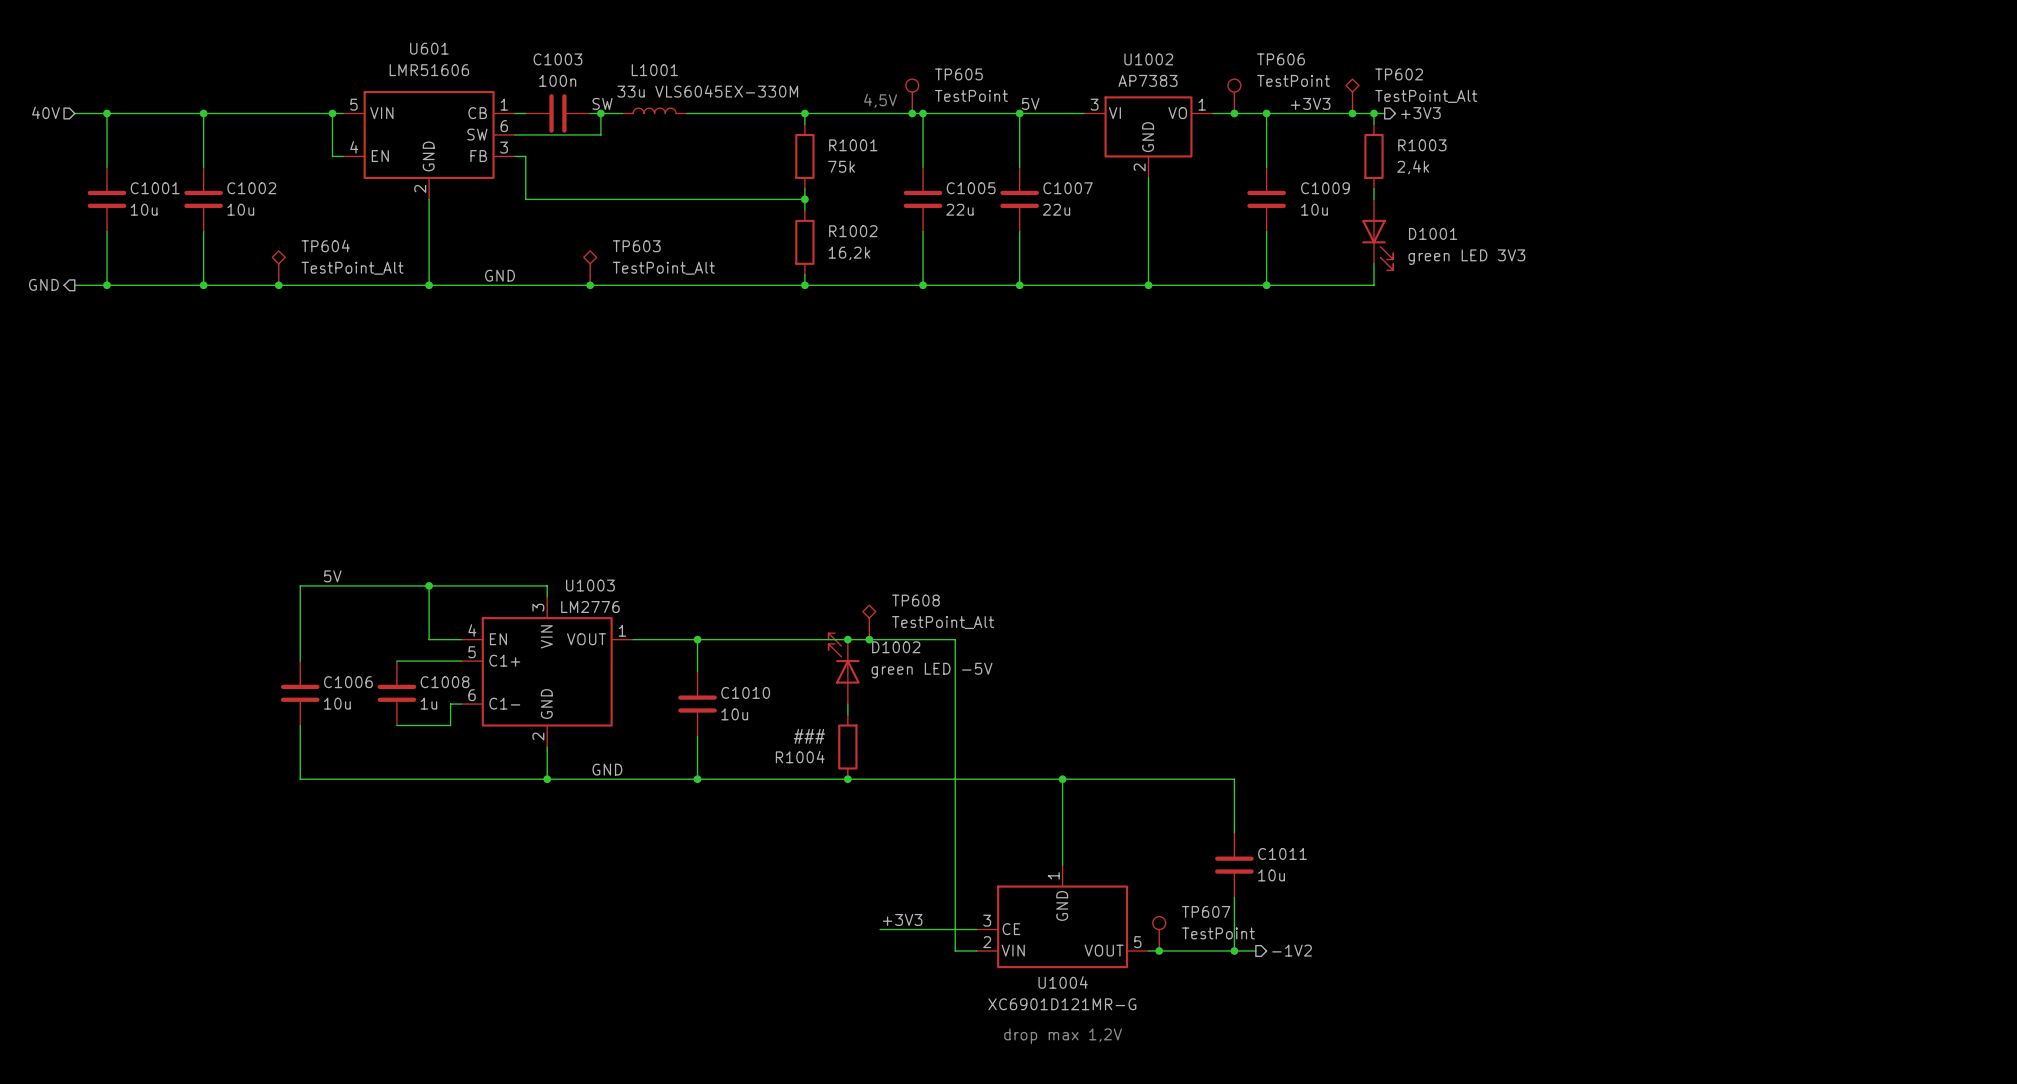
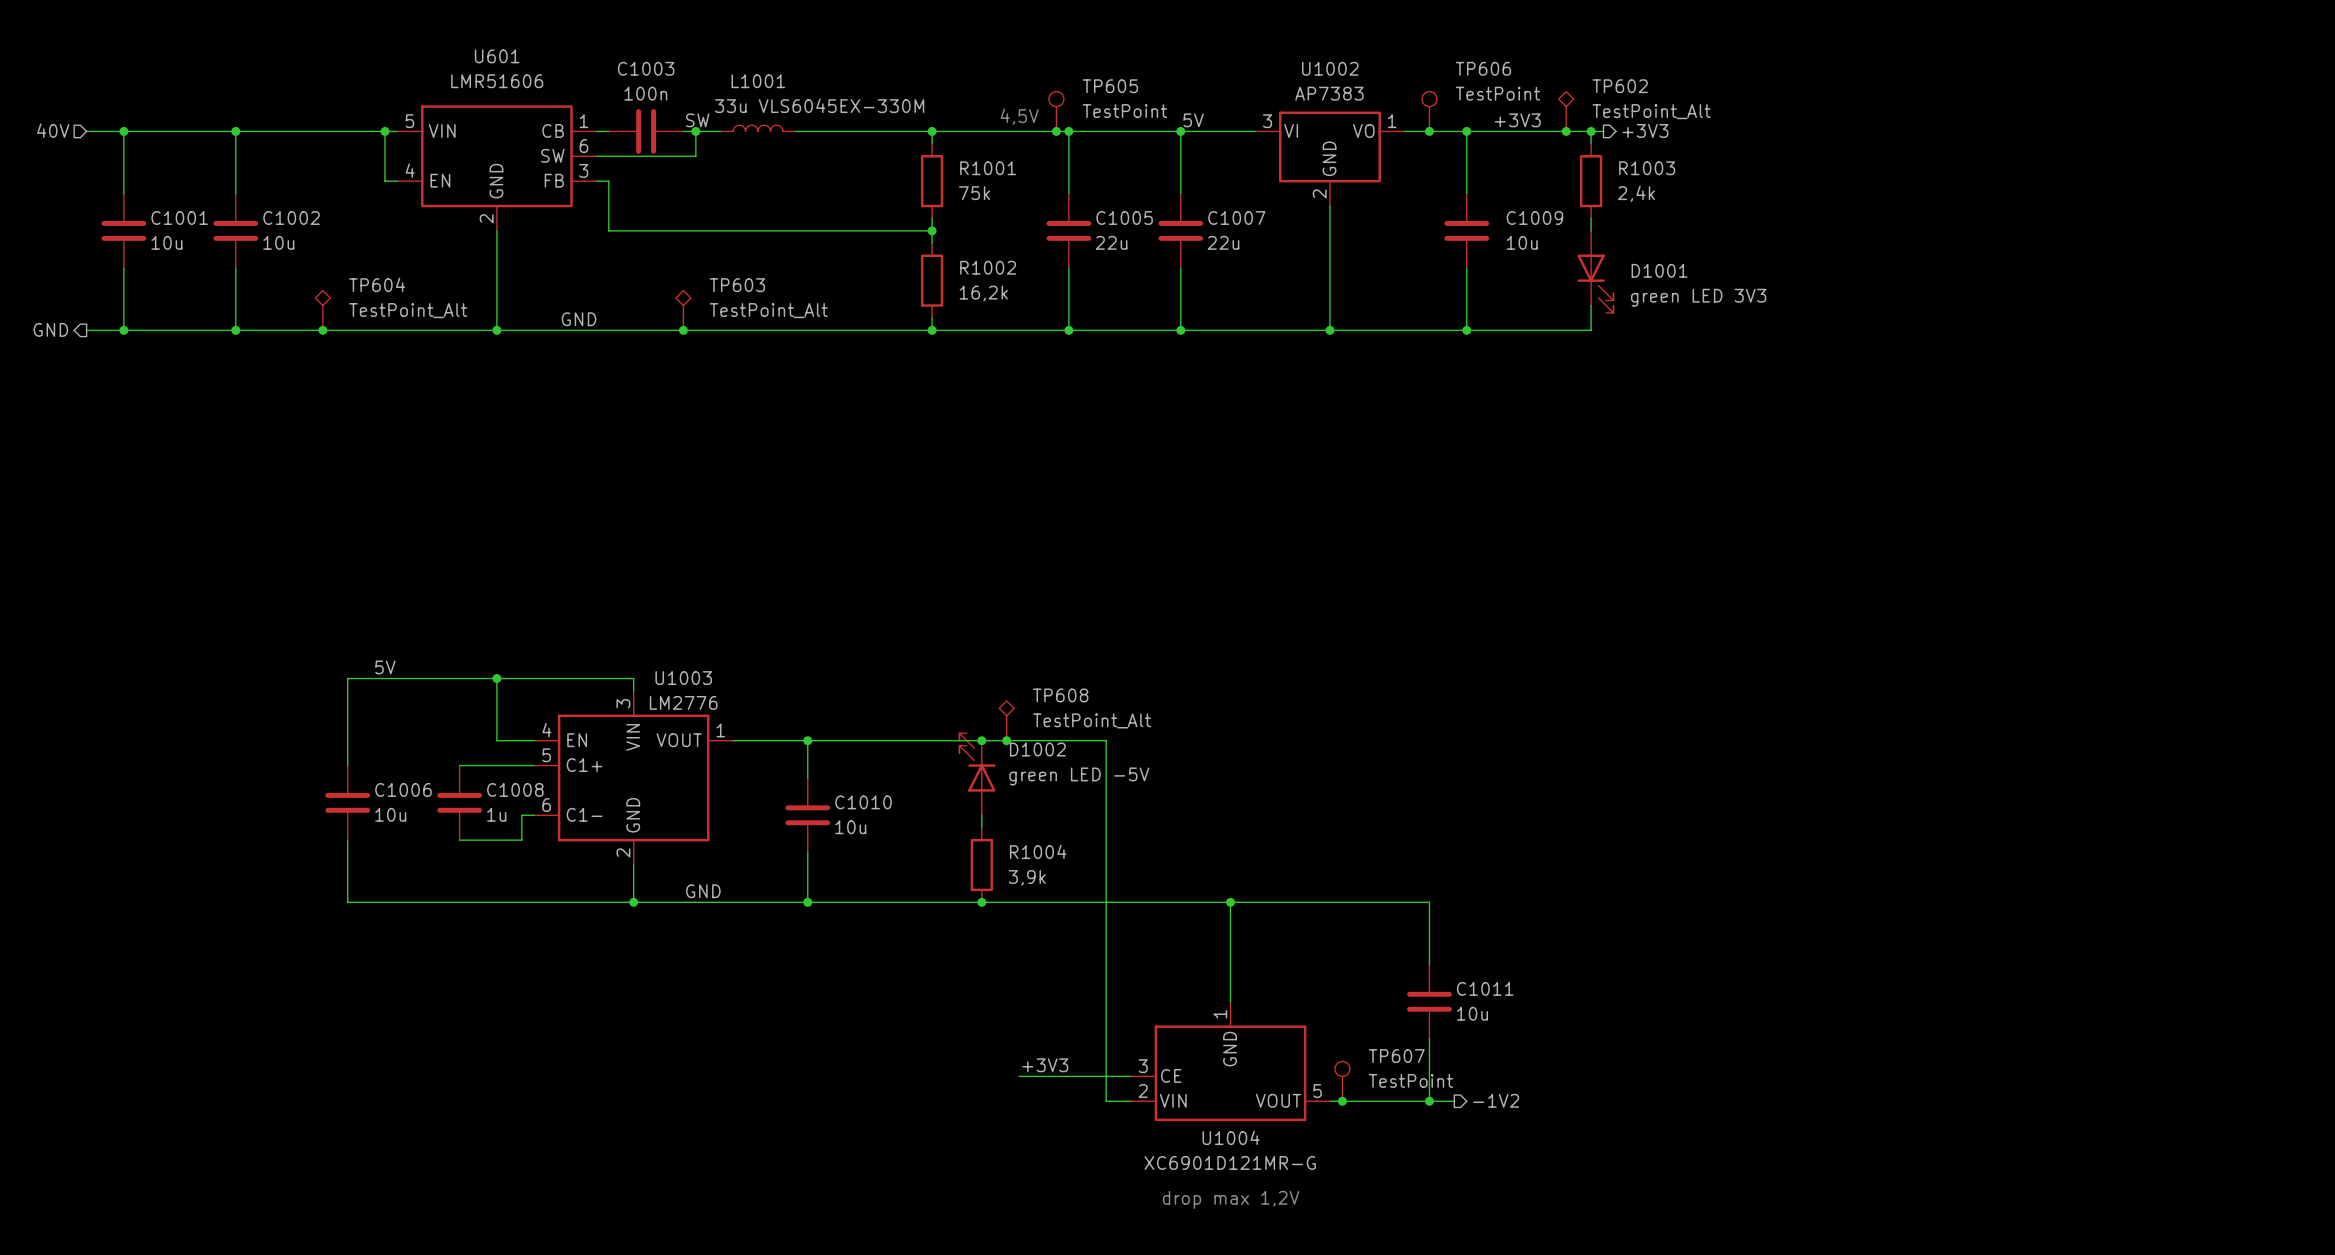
R1004 value: ### (809, 736) -> 3,9k (1027, 877)
R1004 name position: R1004 (800, 757) -> R1004 (1038, 851)

